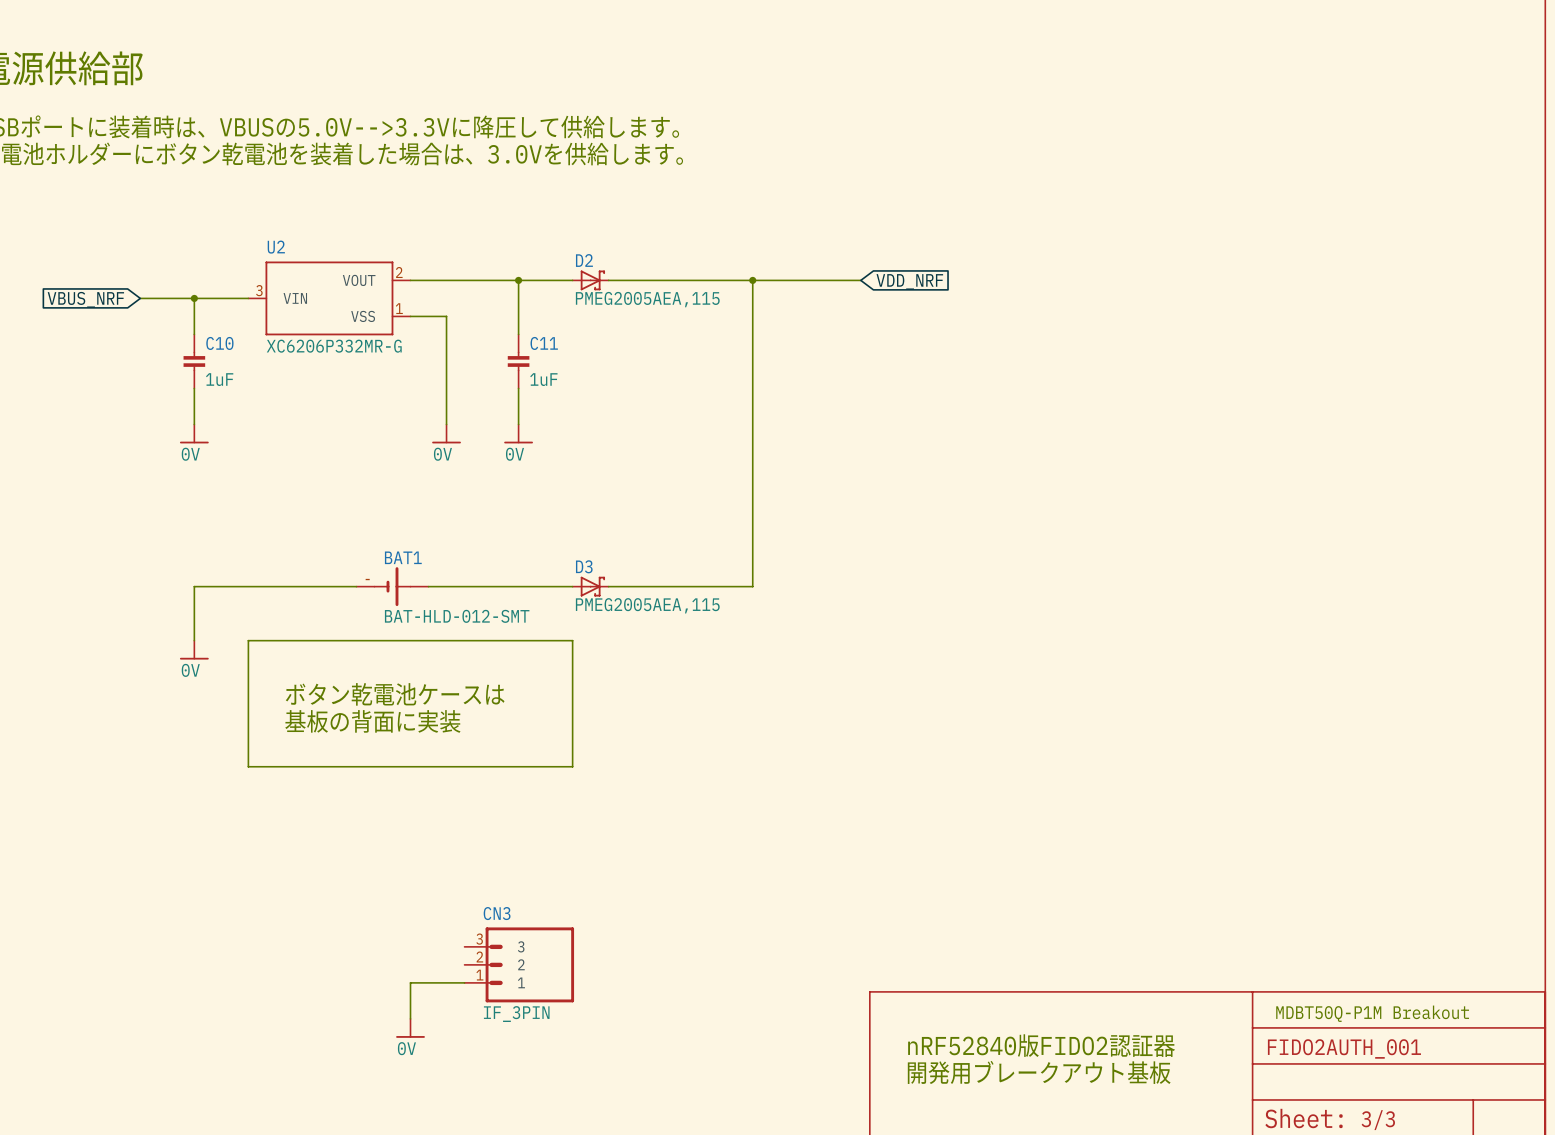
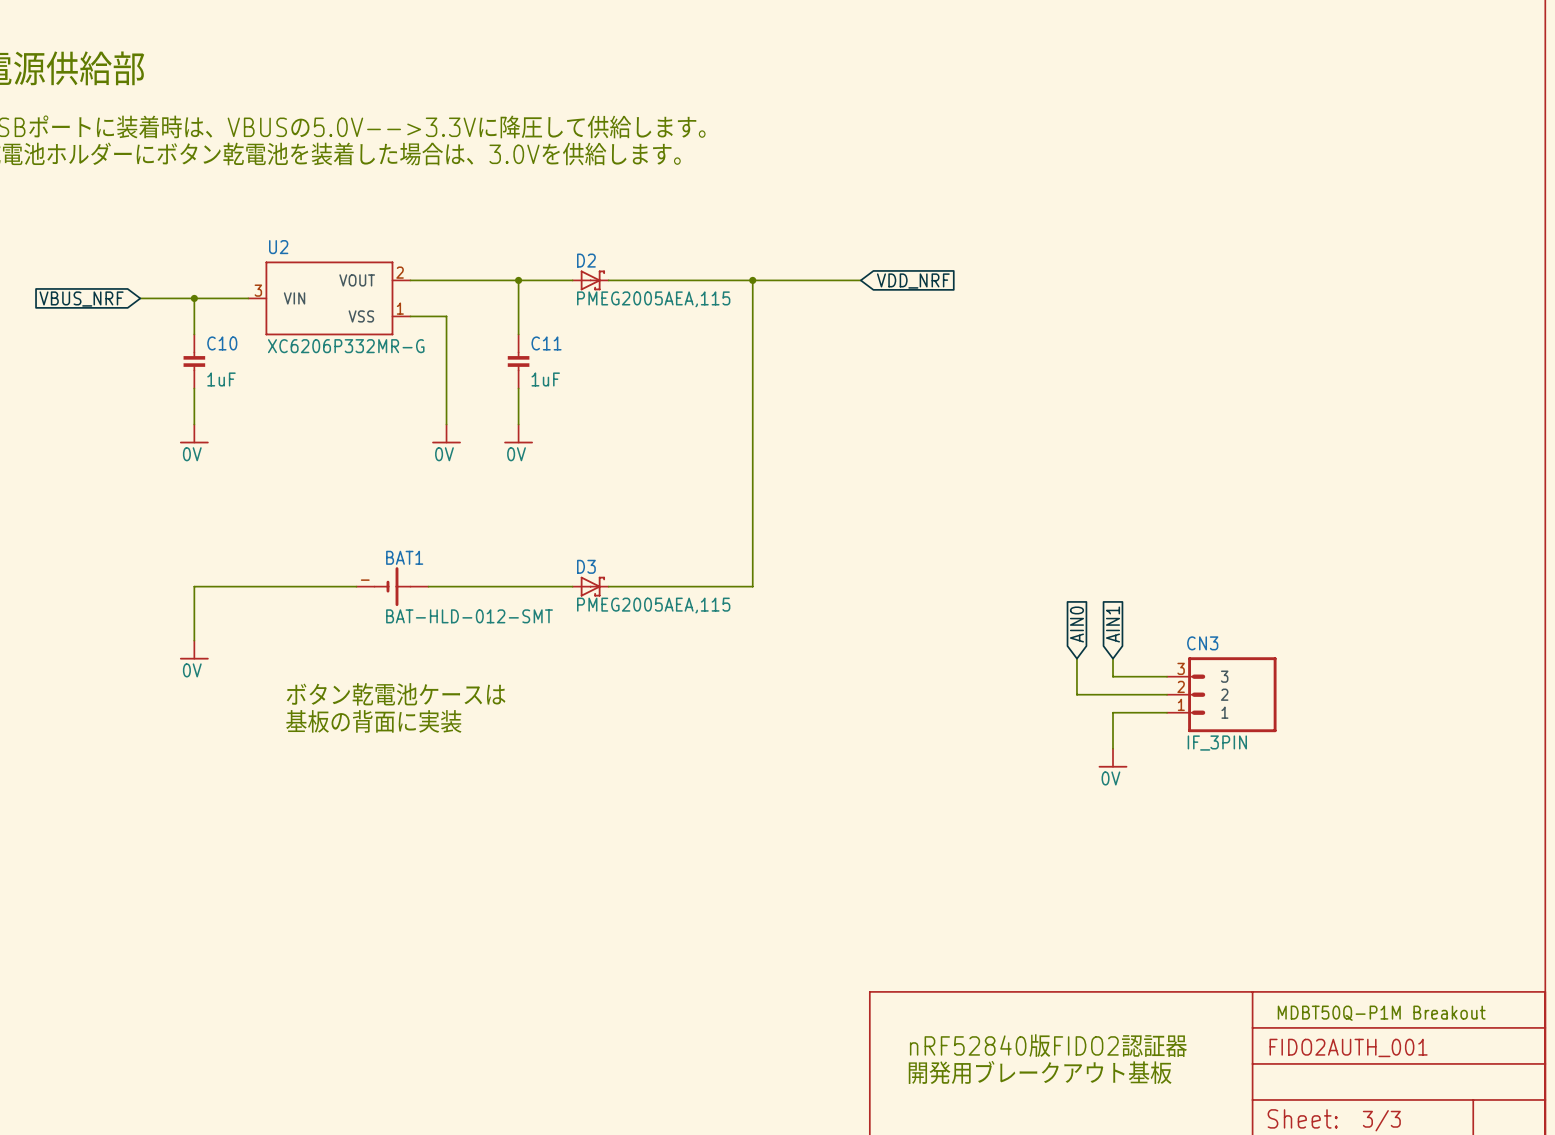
global label: none -> AIN0 (1076, 624)
global label: none -> AIN1 (1112, 624)
wire: (248, 640) (572, 640) (572, 766) (248, 766) (248, 640) -> none
wire: none -> (1076, 658) (1076, 694) (1167, 694)
wire: none -> (1112, 658) (1112, 676) (1167, 676)
wire: none -> (1167, 712) (1112, 712) (1112, 748)
power symbol: none -> 0V (1112, 758)
CN3 position: (519, 964) -> (1221, 694)
wire: (464, 982) (410, 982) (410, 1018) -> none
power symbol: 0V (410, 1028) -> none

